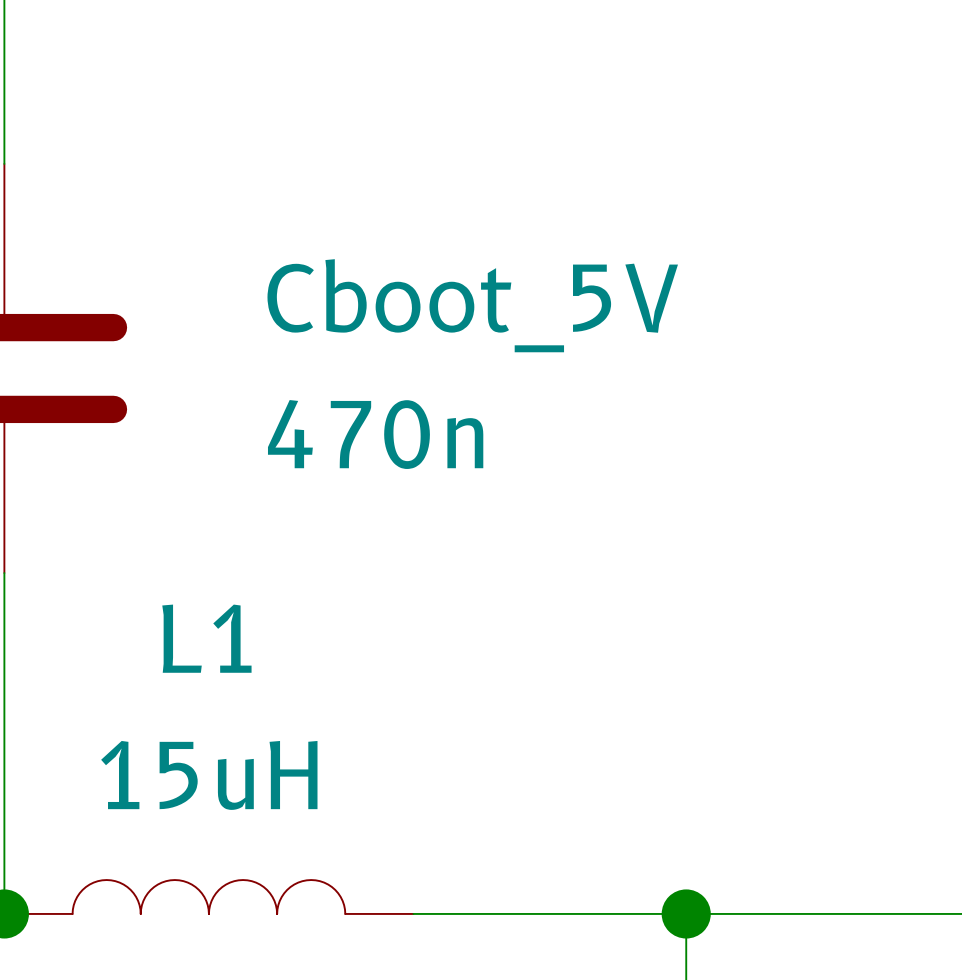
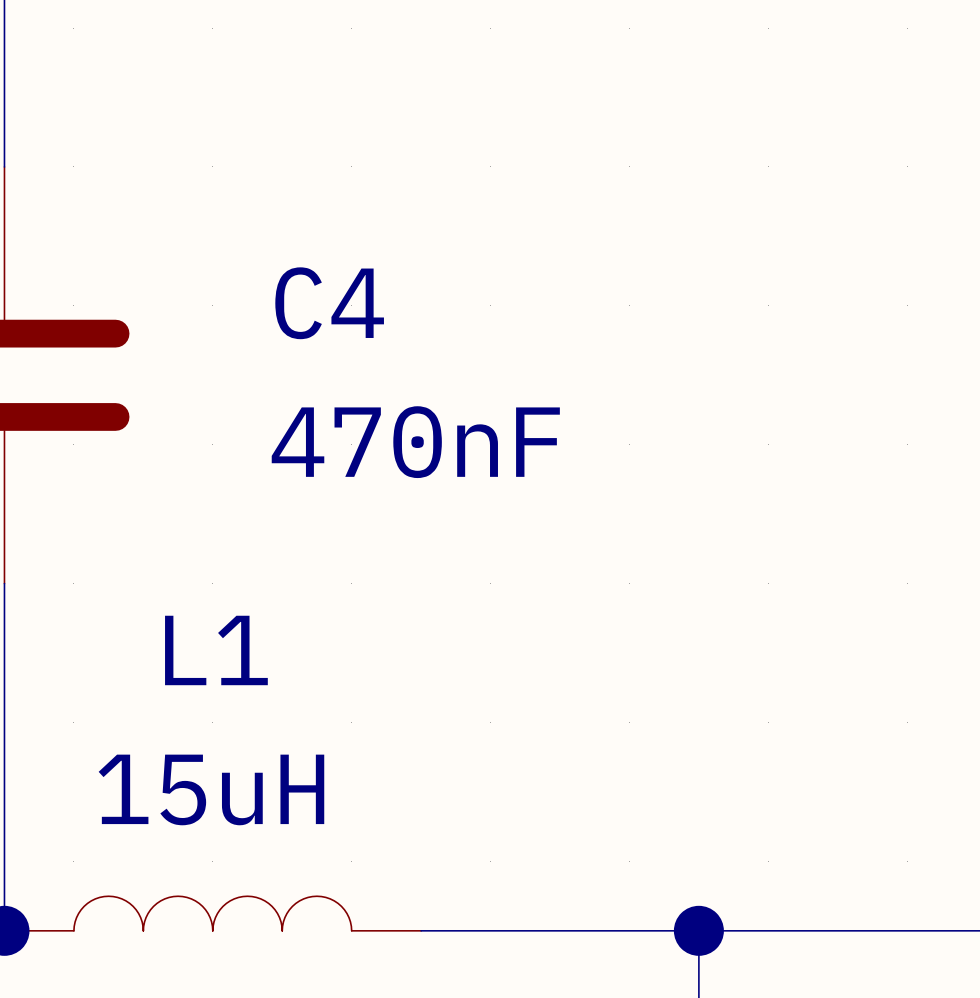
Cboot_5V name: Cboot_5V (472, 305) -> C4 (329, 303)
Cboot_5V value: 470n (375, 434) -> 470nF (415, 442)

